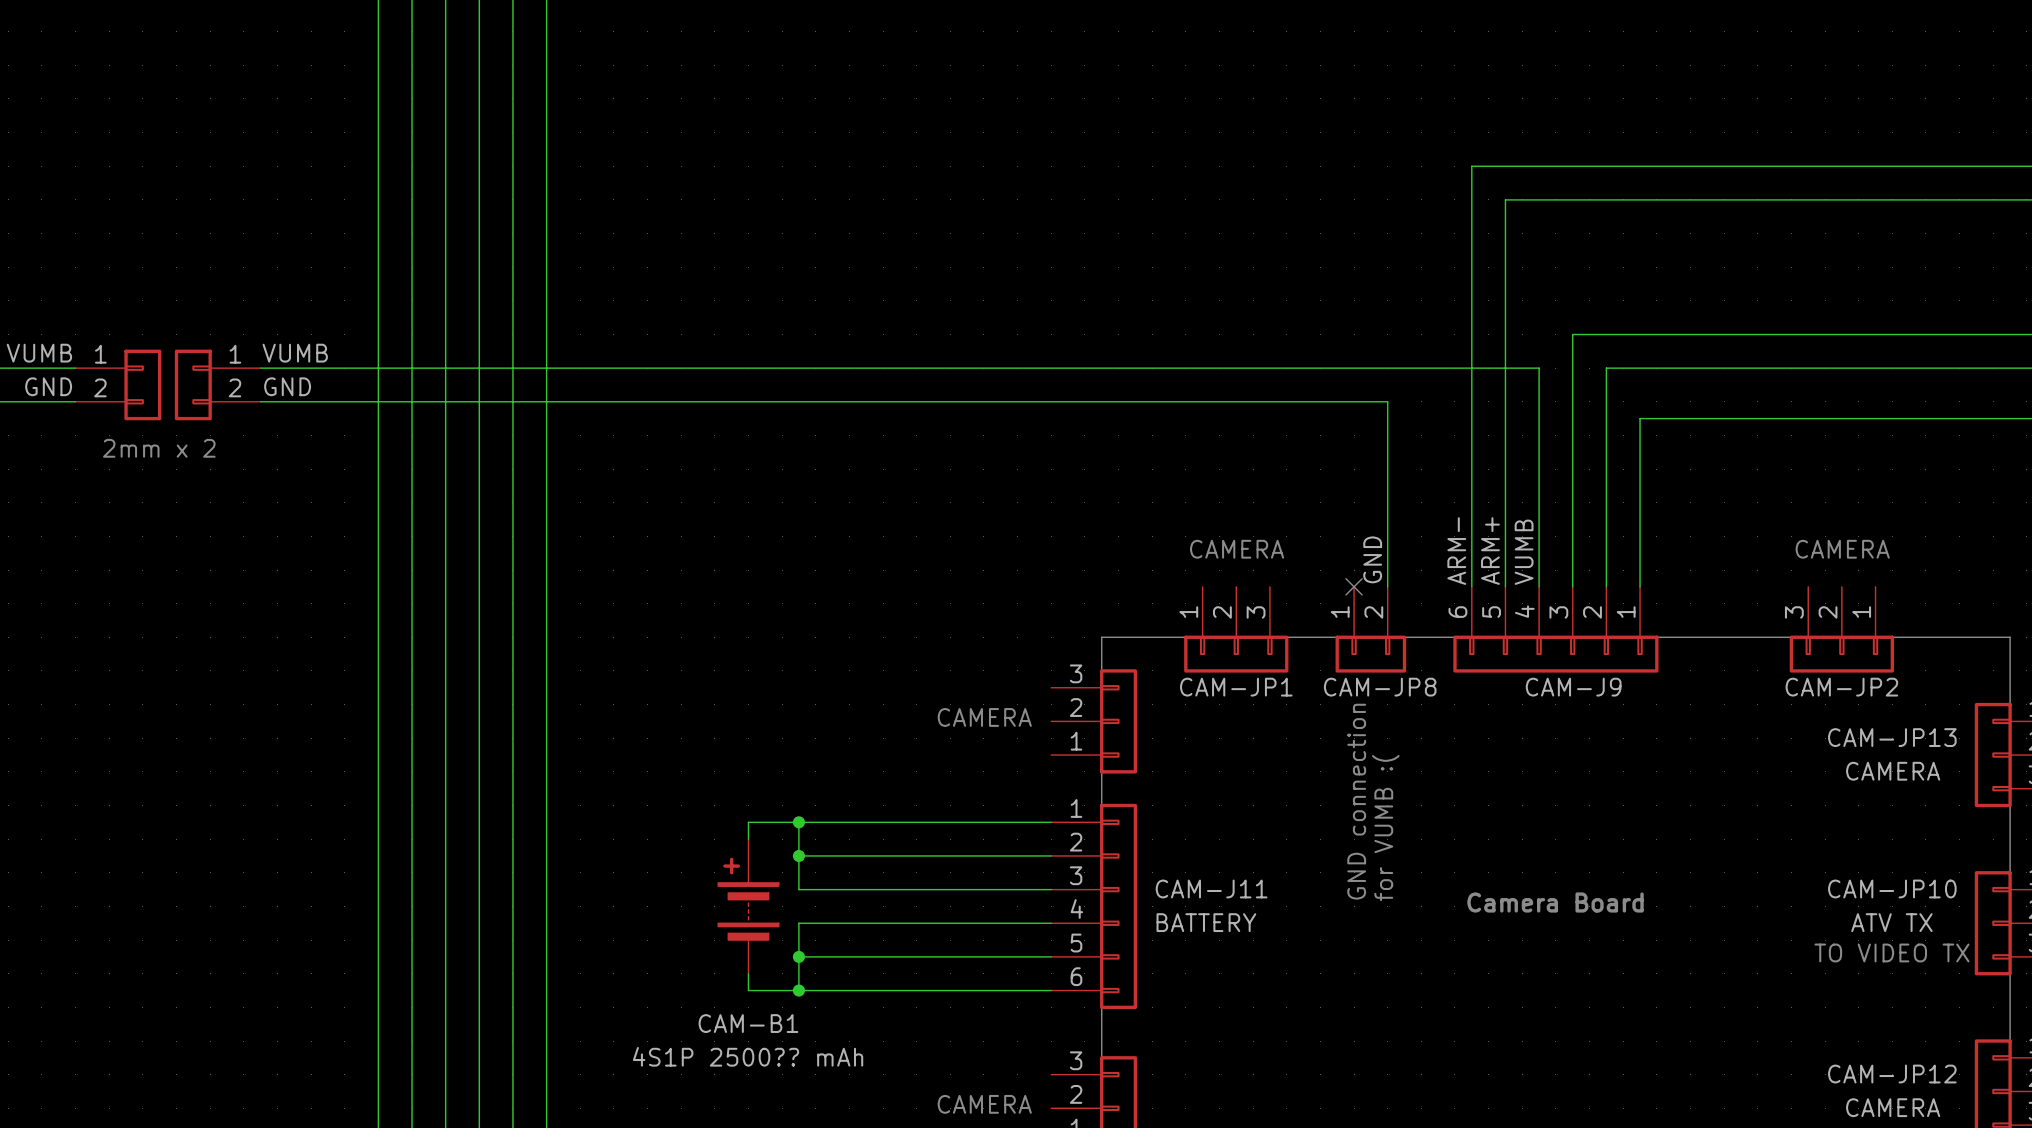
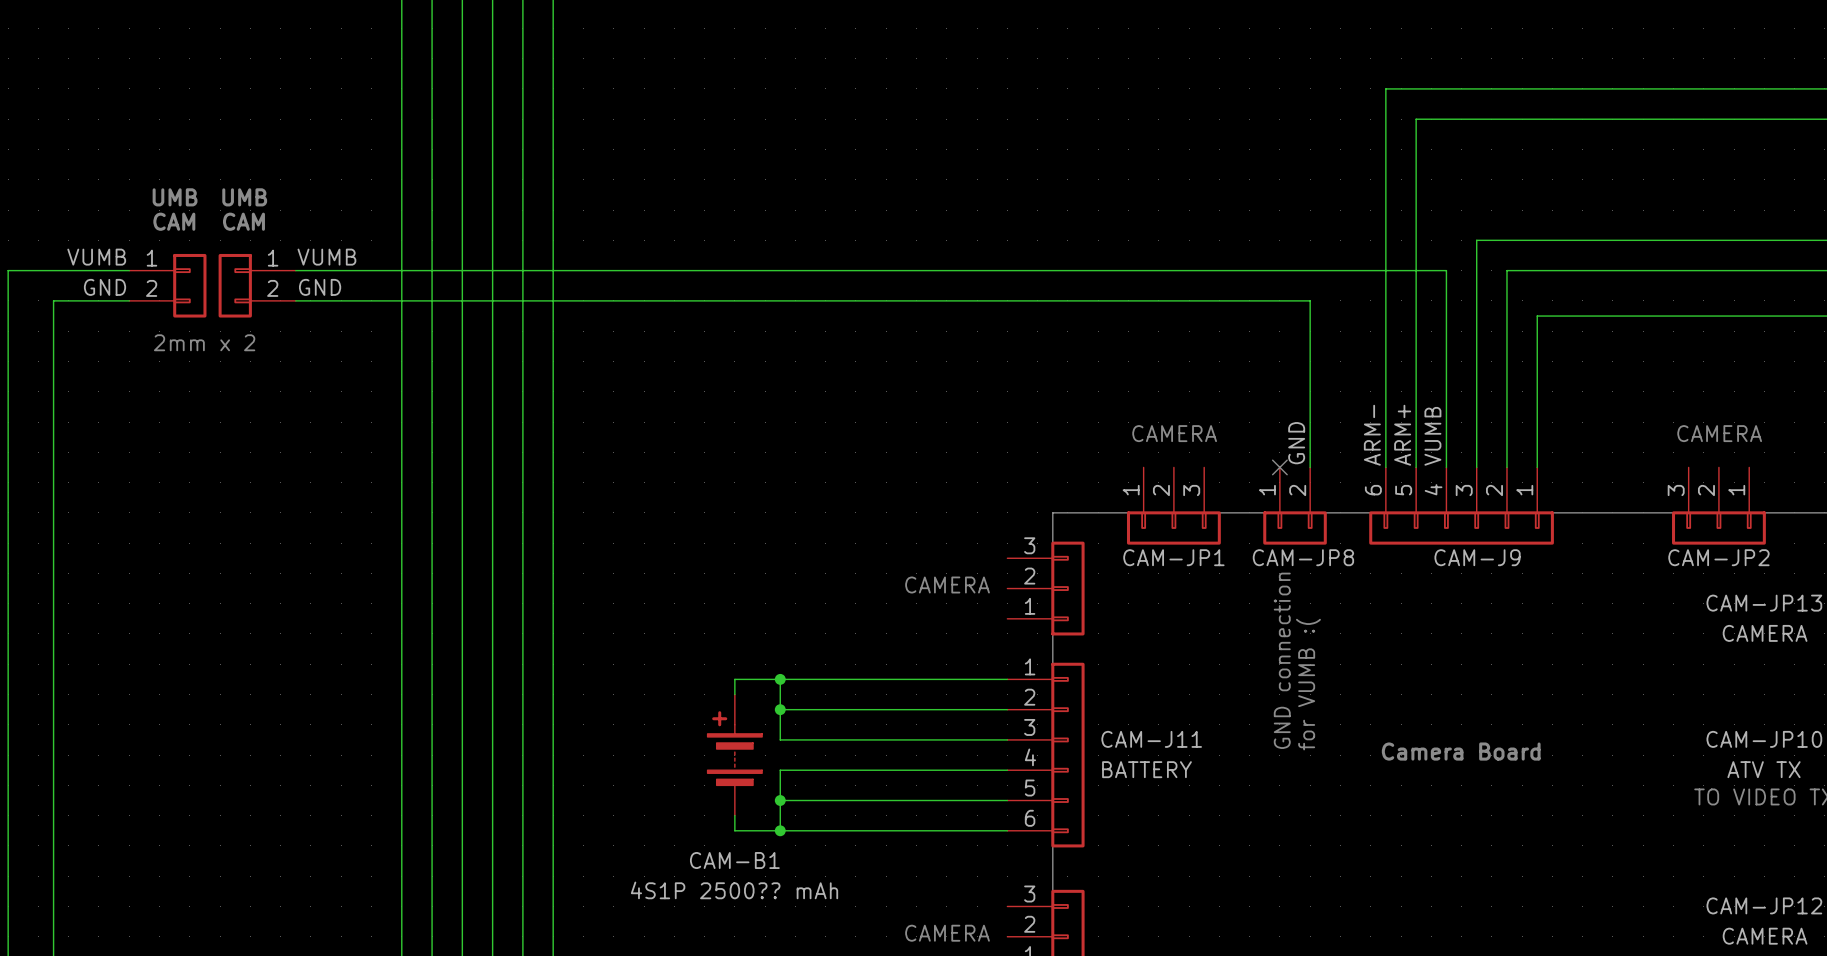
text: none -> UMB (175, 197)
text: none -> UMB (244, 197)
text: none -> CAM (174, 221)
text: none -> CAM (243, 221)

